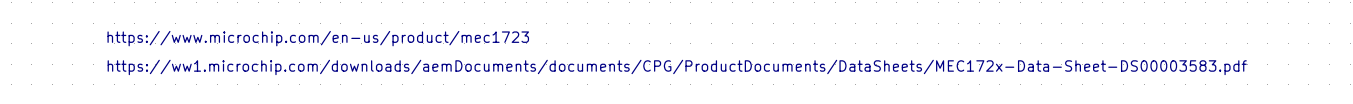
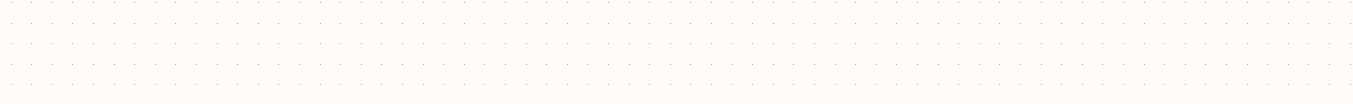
text: https://www.microchip.com/en-us/product/mec1723 (318, 38) -> none
text: https://ww1.microchip.com/downloads/aemDocuments/documents/CPG/ProductDocuments/DataSheets/MEC172x-Data-Sheet-DS00003583.pdf (677, 67) -> none

